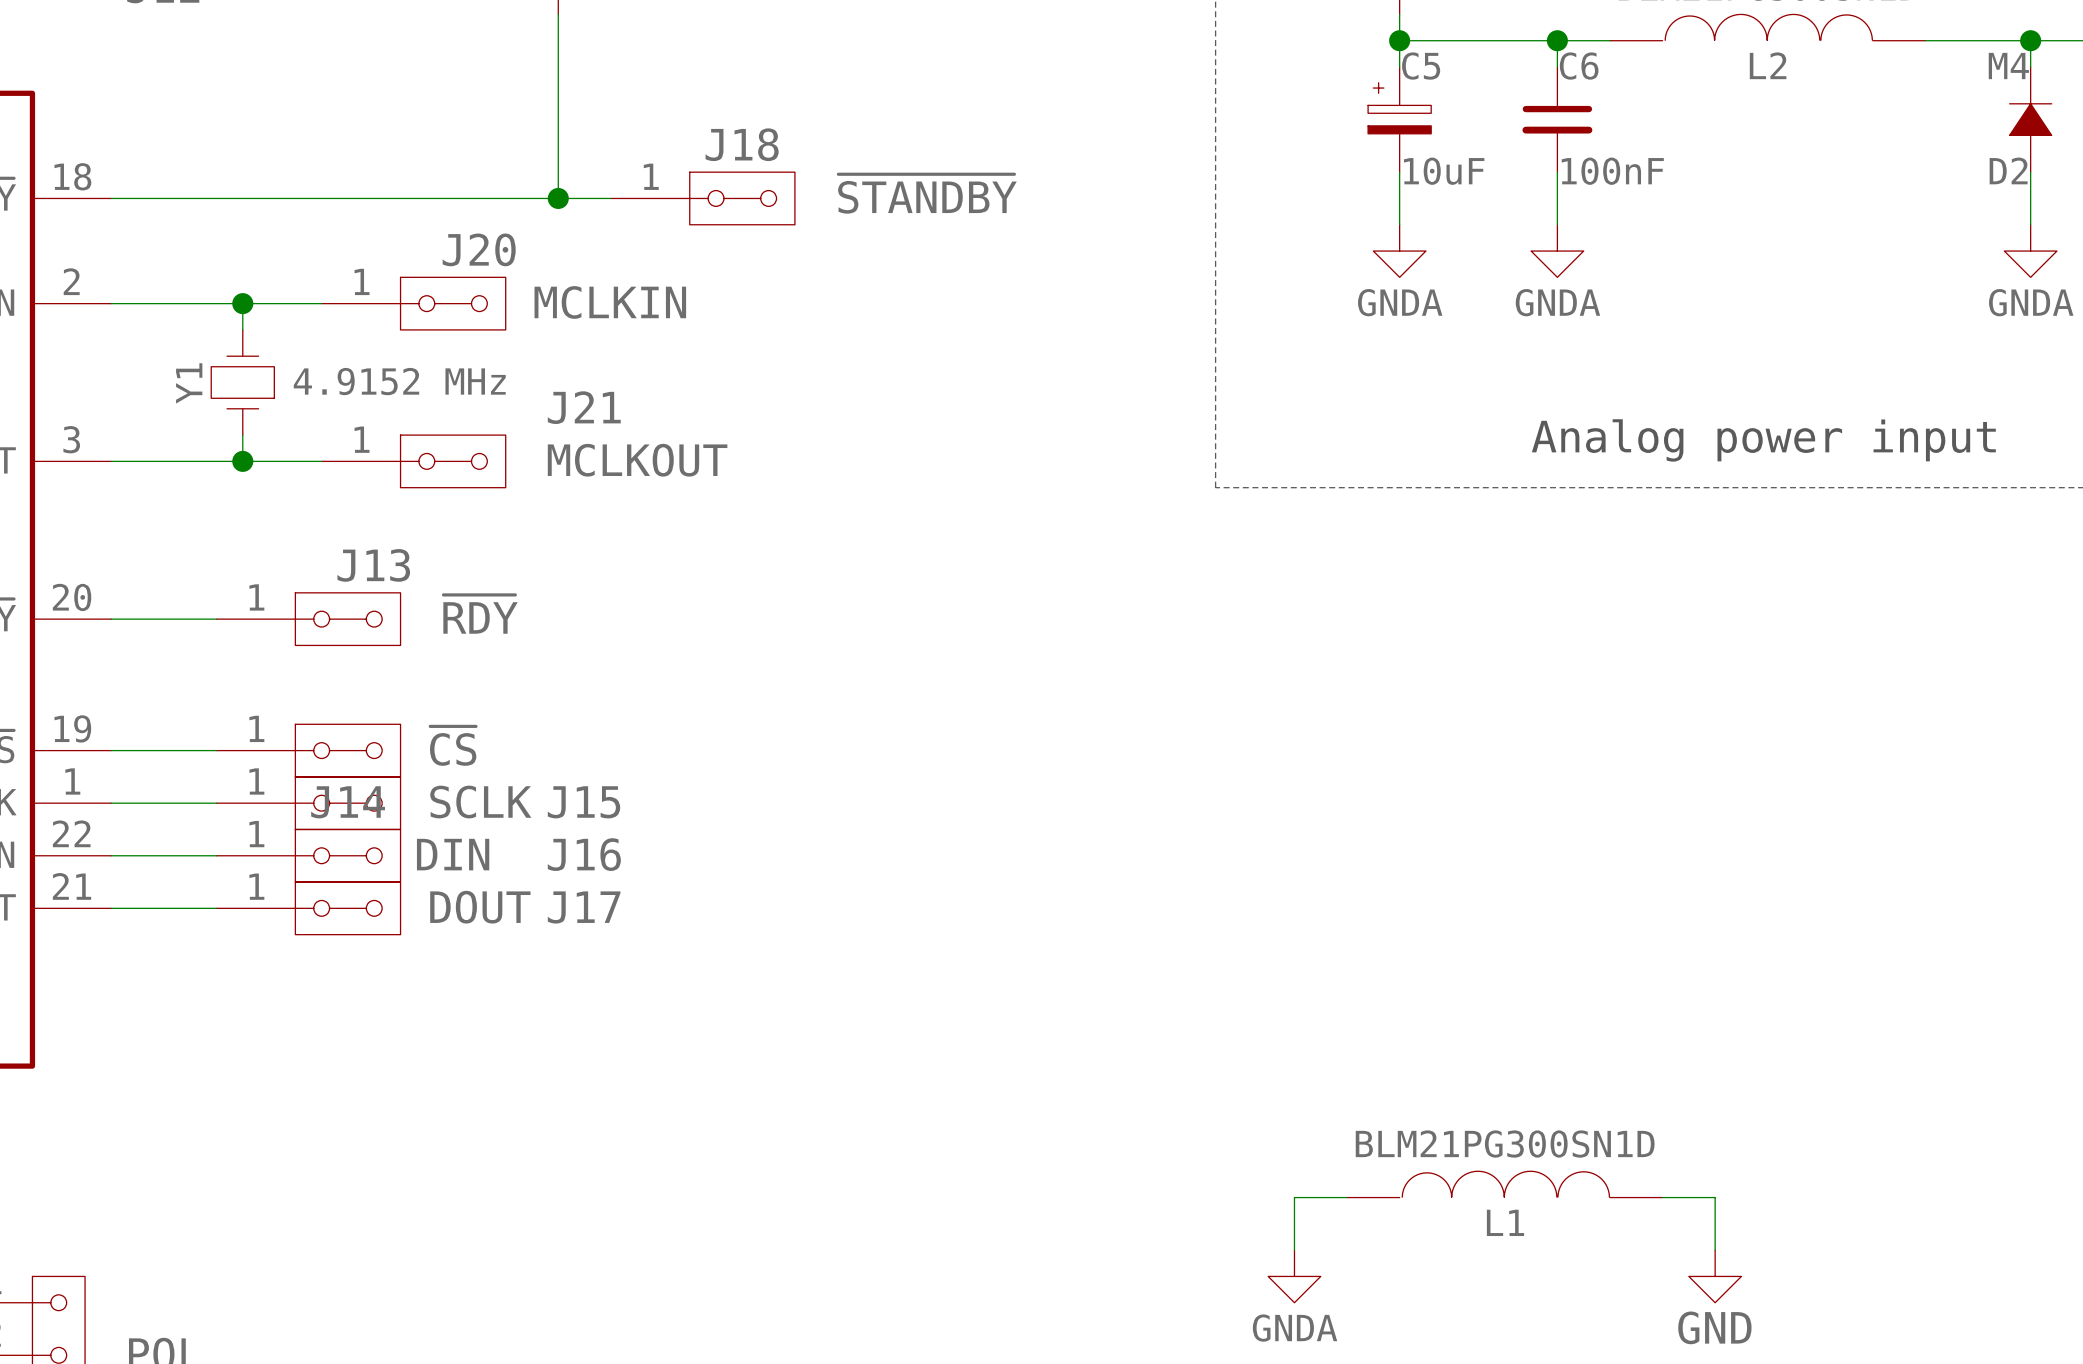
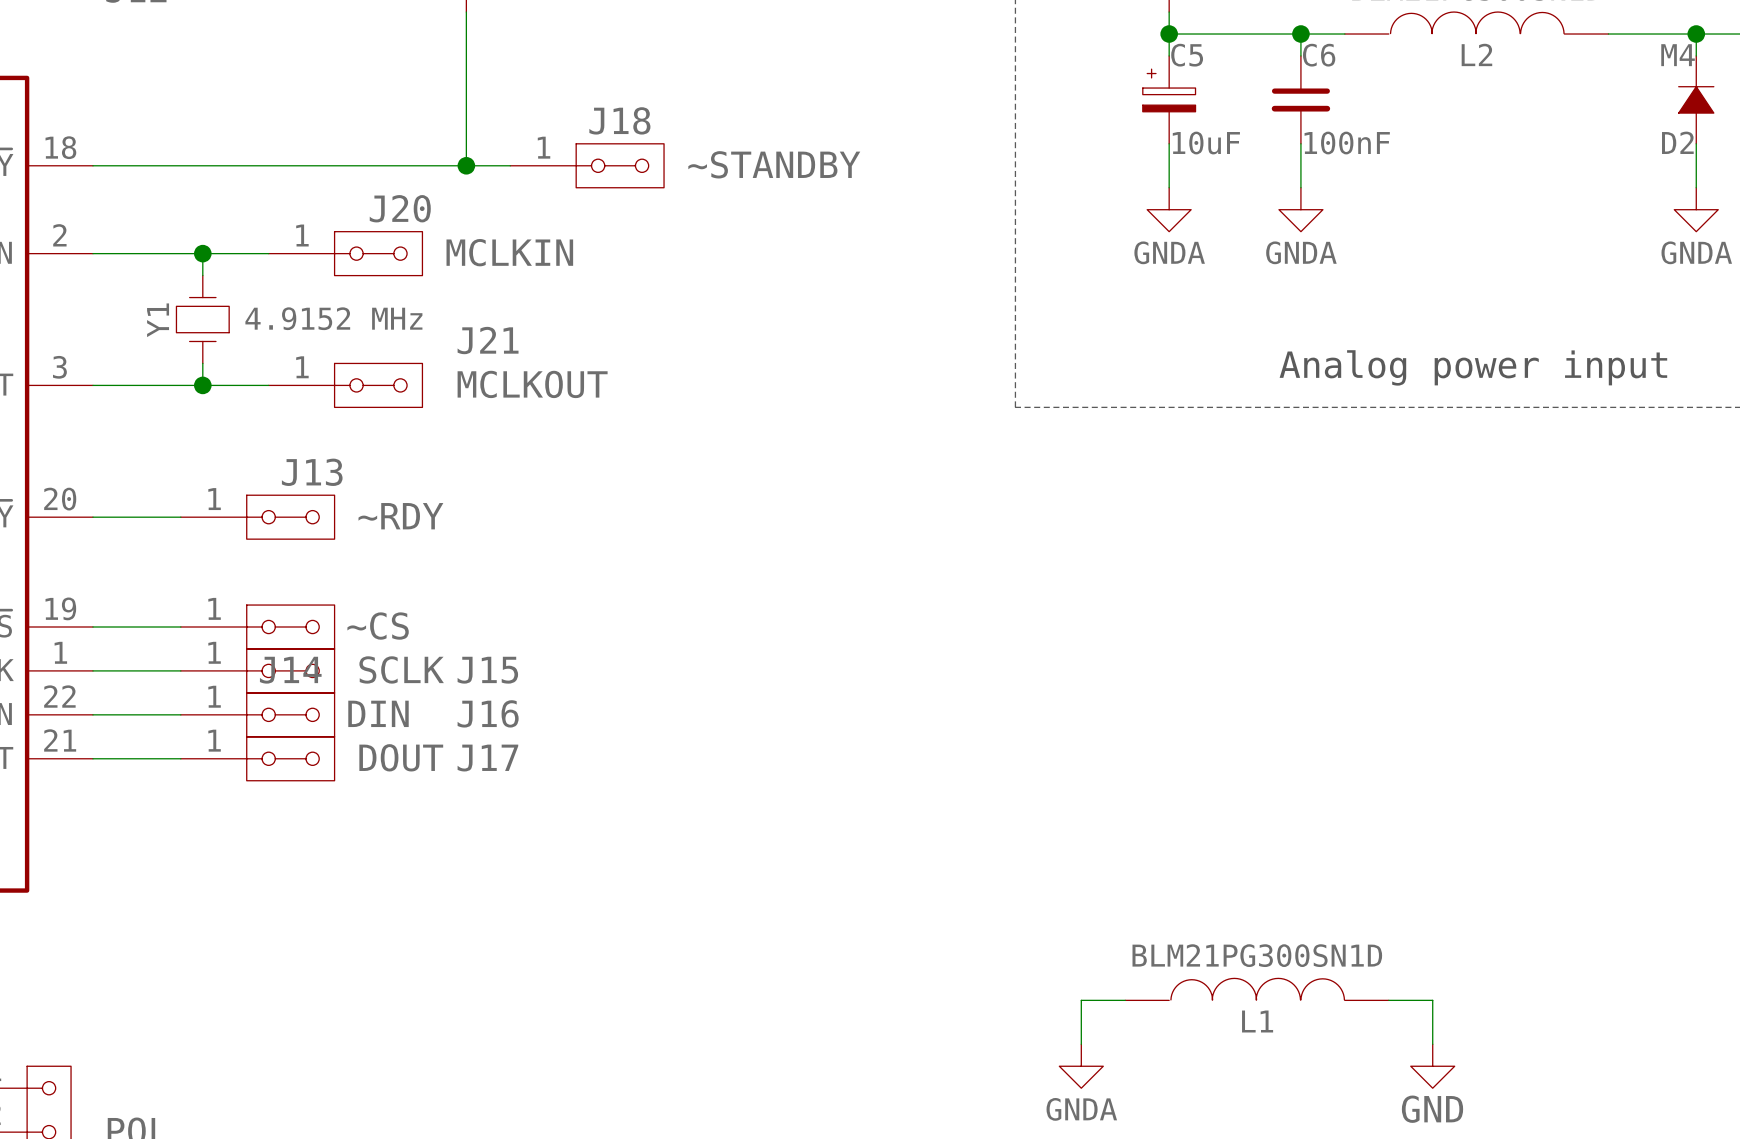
J18 value: ~{STANDBY} (927, 193) -> ~STANDBY (774, 164)
J13 value: ~{RDY} (480, 614) -> ~RDY (400, 516)
J14 value: ~{CS} (453, 746) -> ~CS (378, 626)

